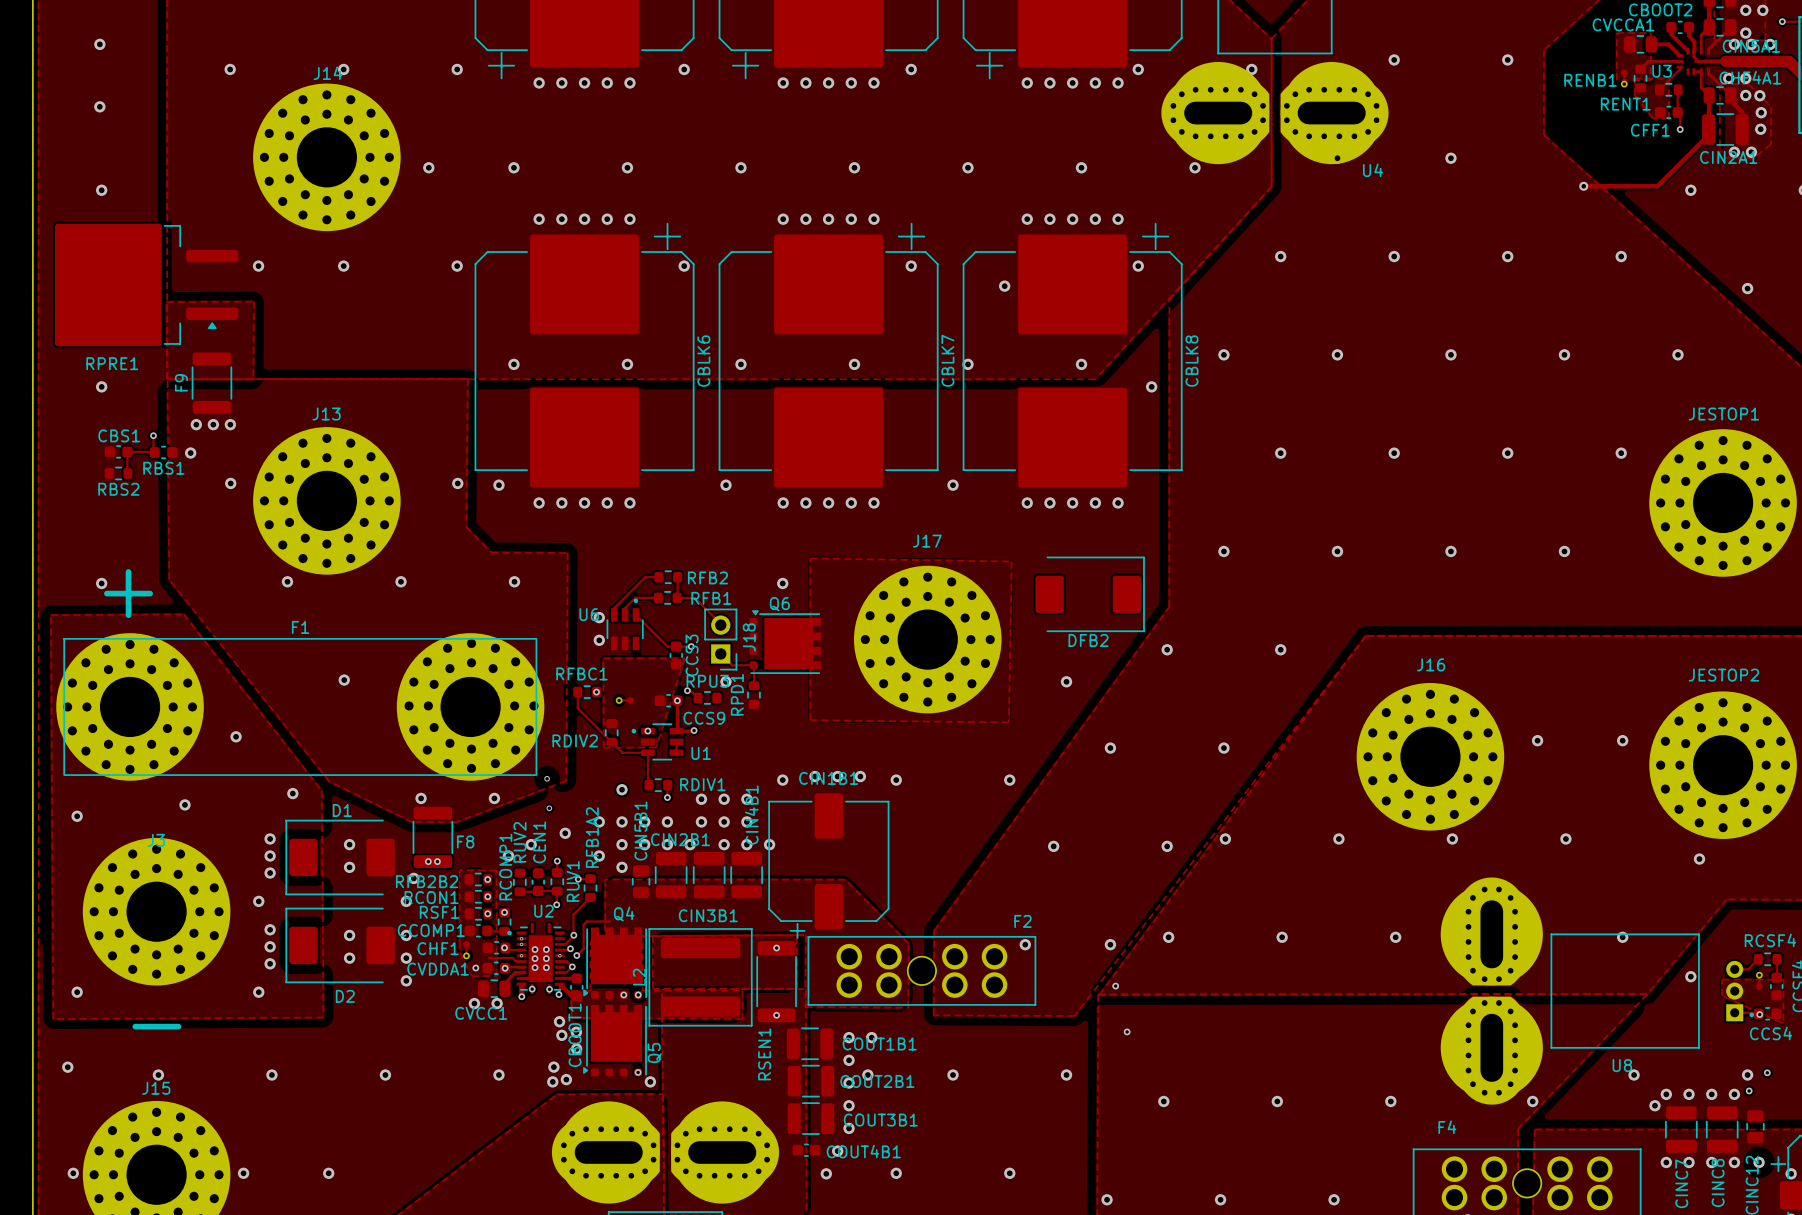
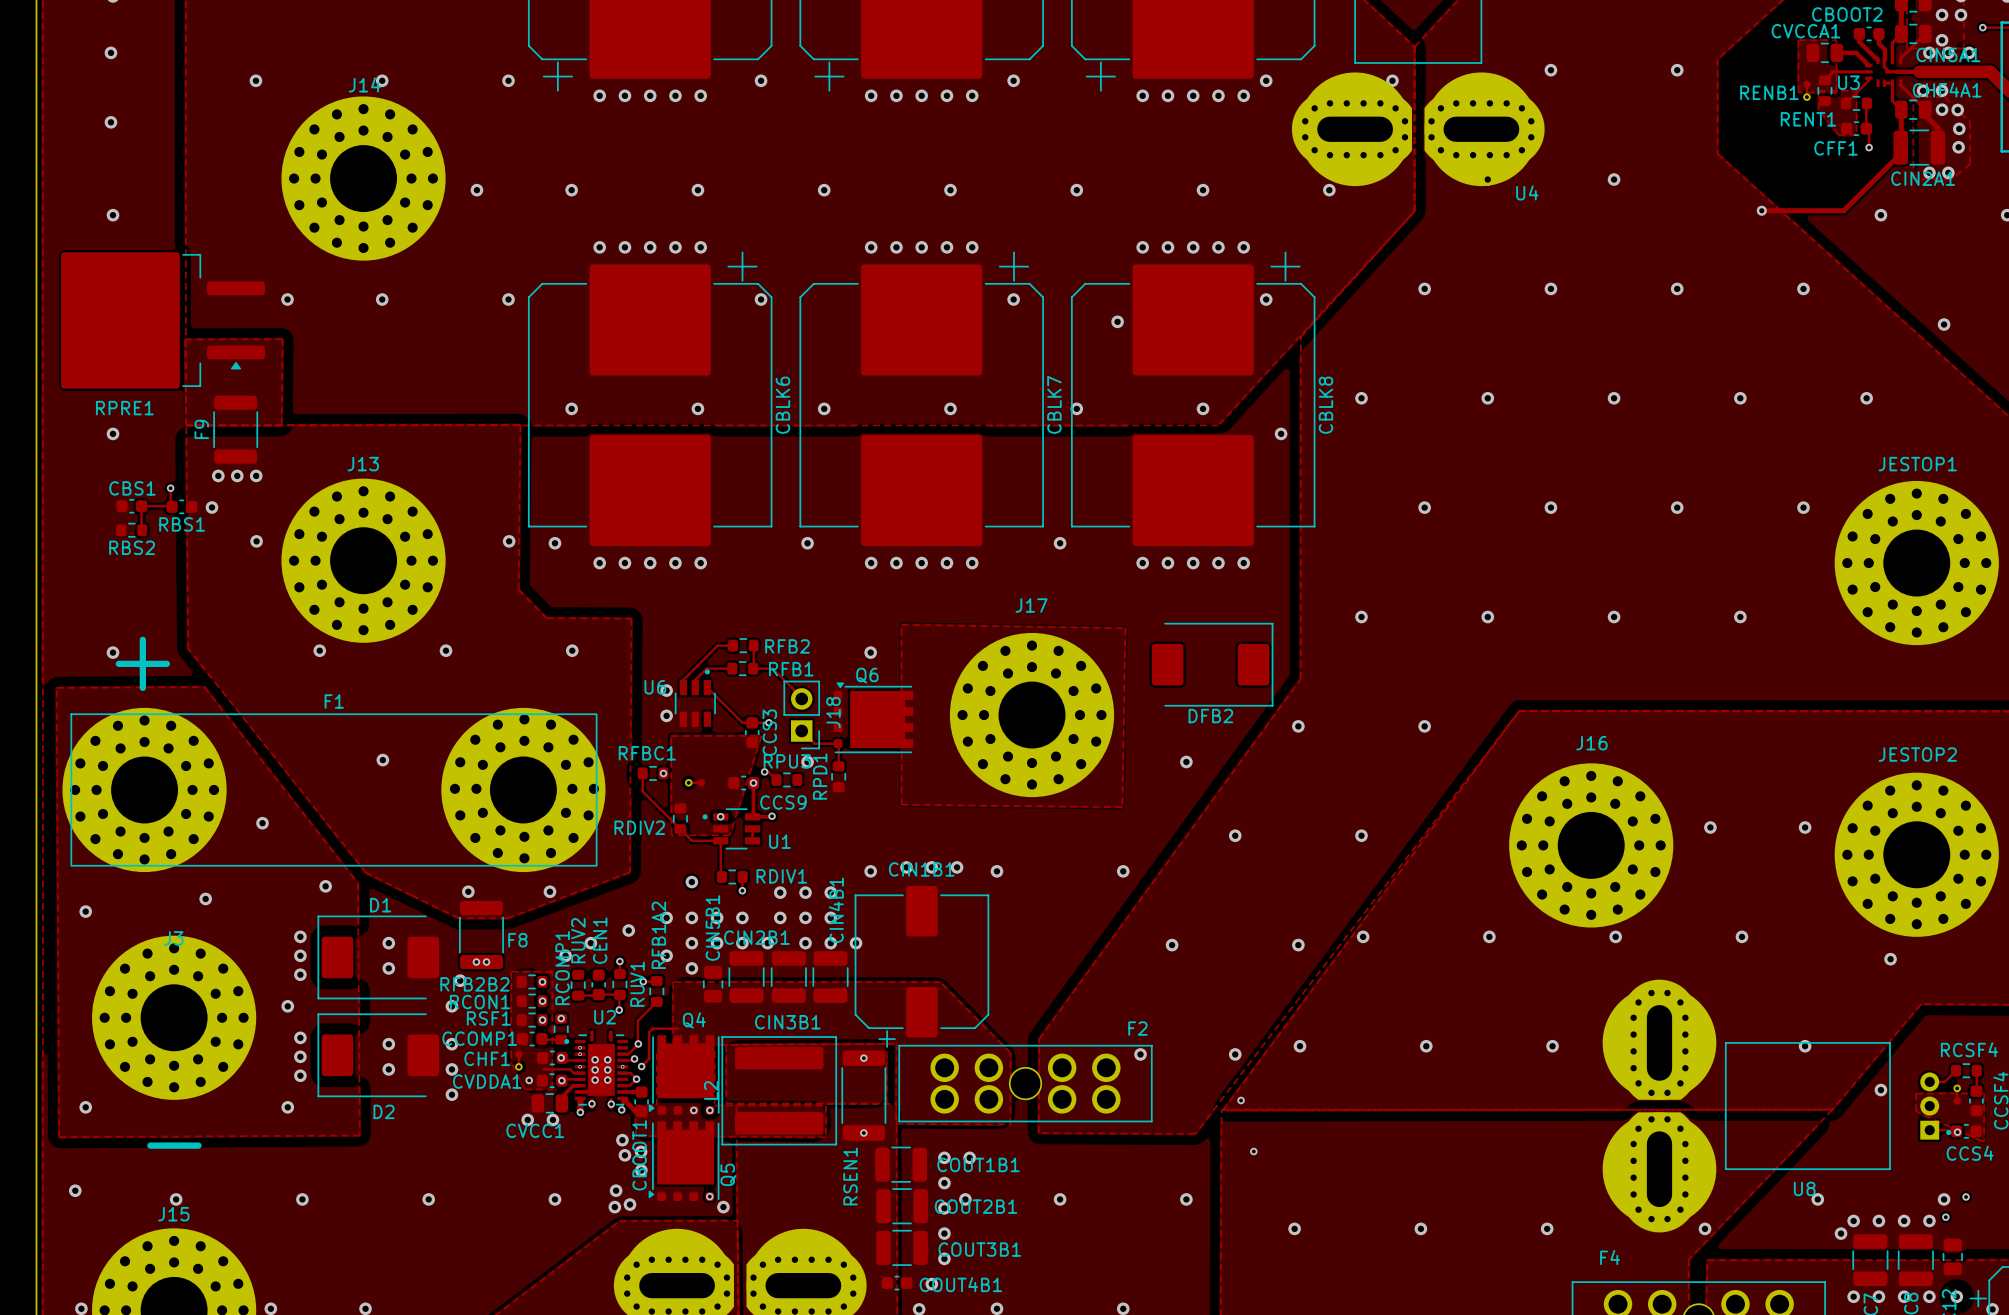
via: (547, 778) -> none
via: (549, 808) -> none

